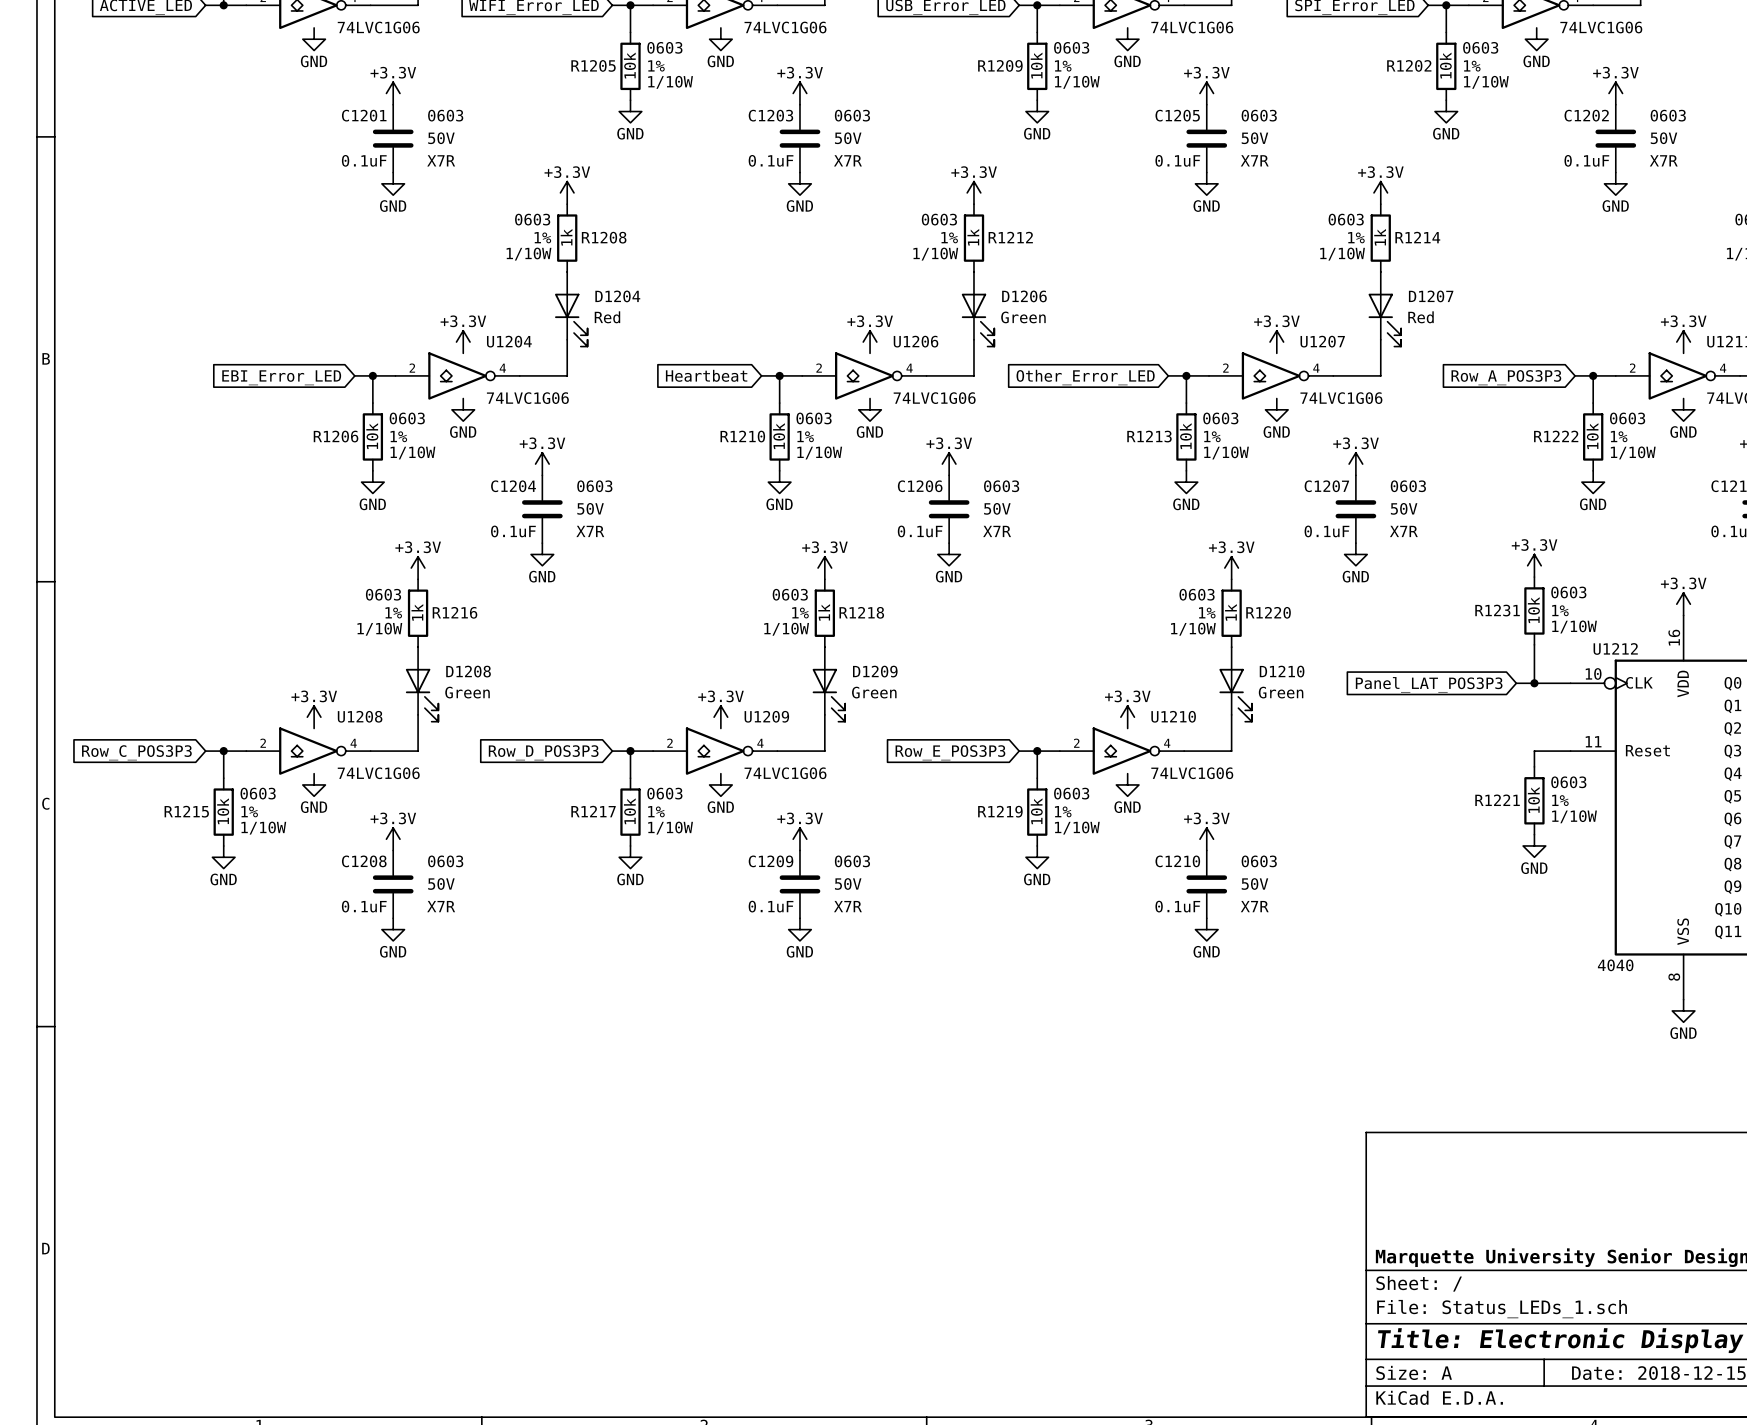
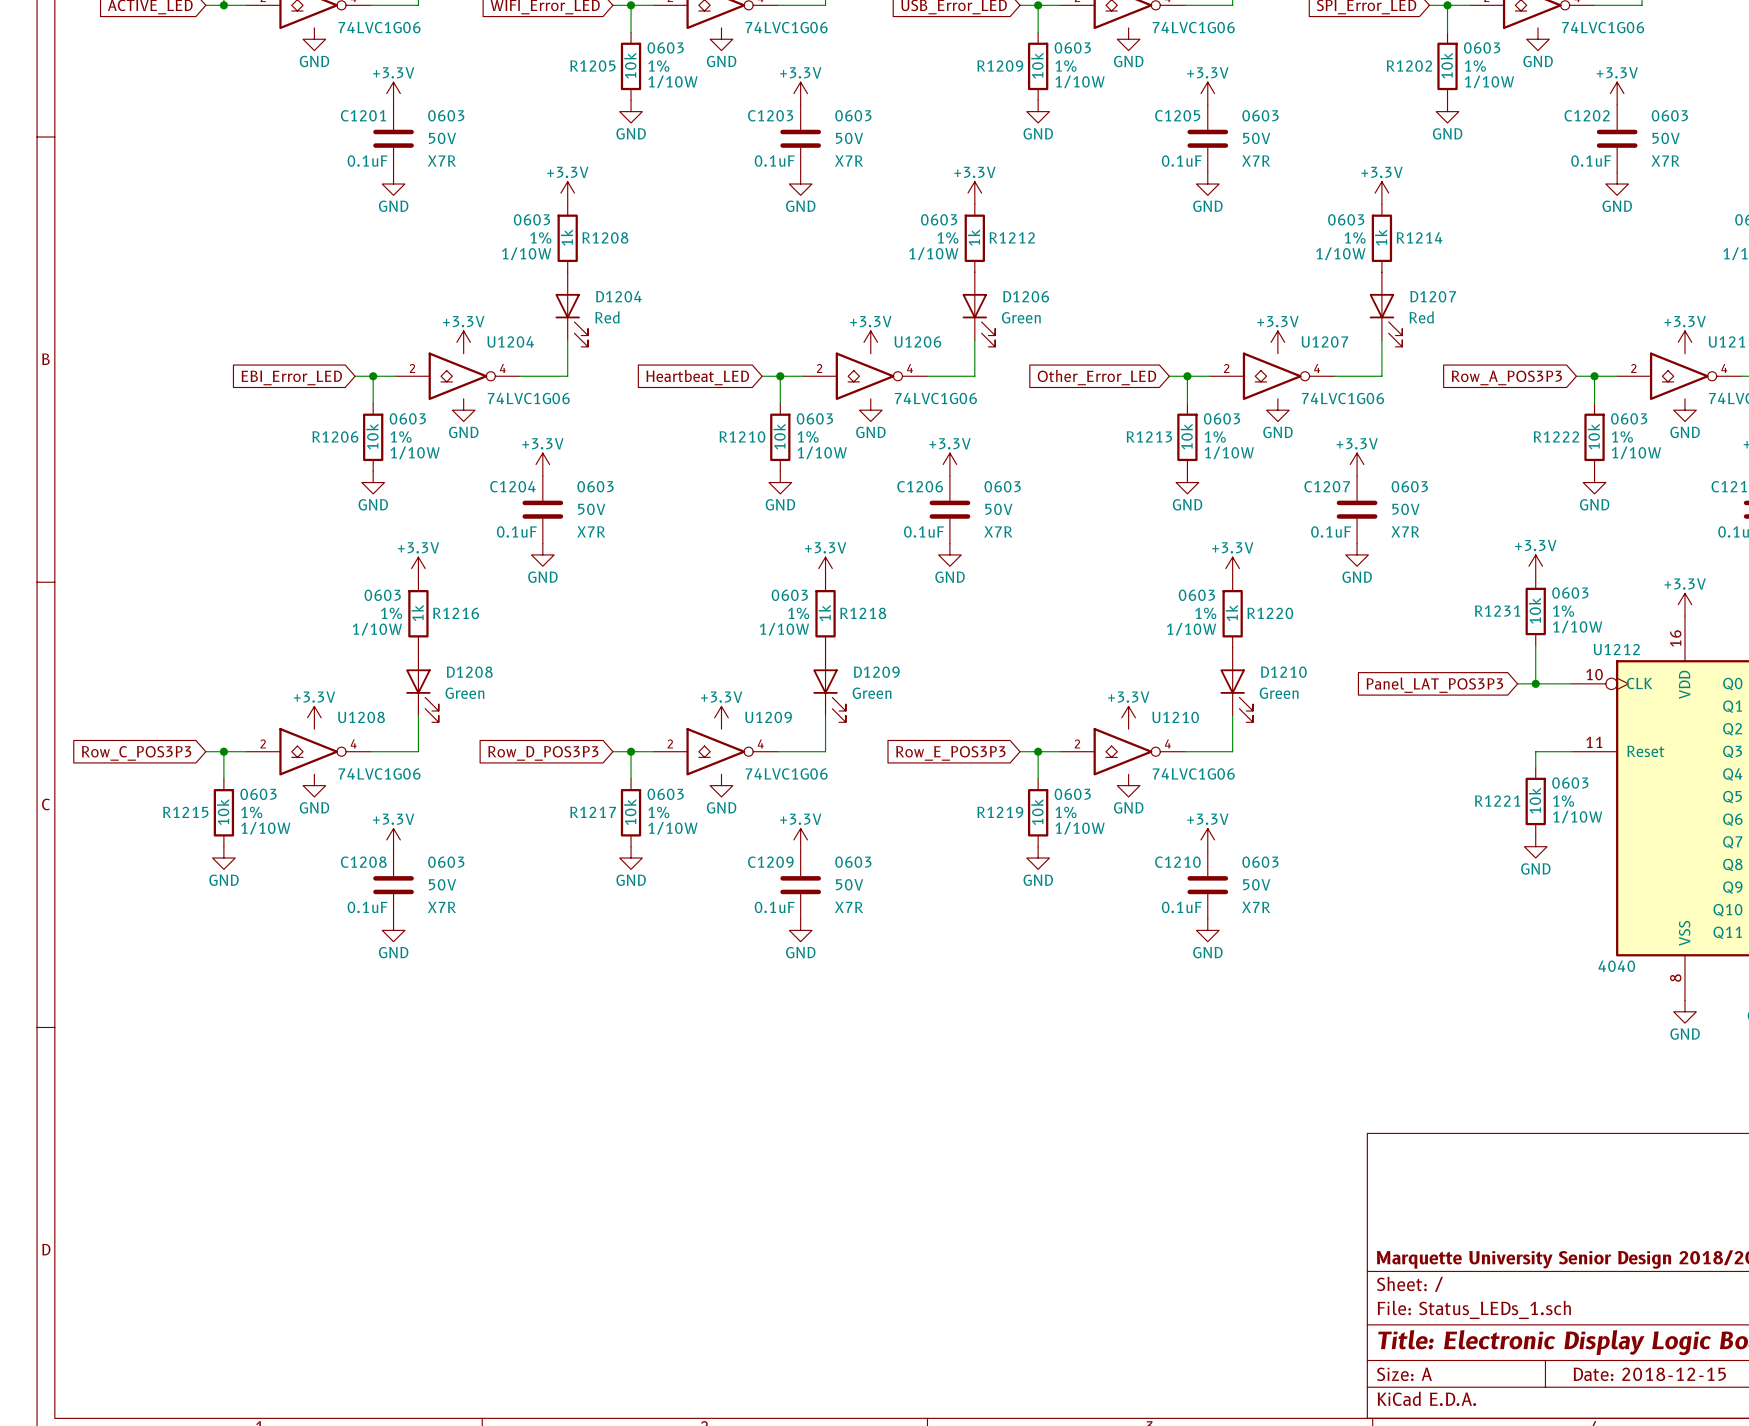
global label: Heartbeat (706, 375) -> Heartbeat_LED (697, 377)

